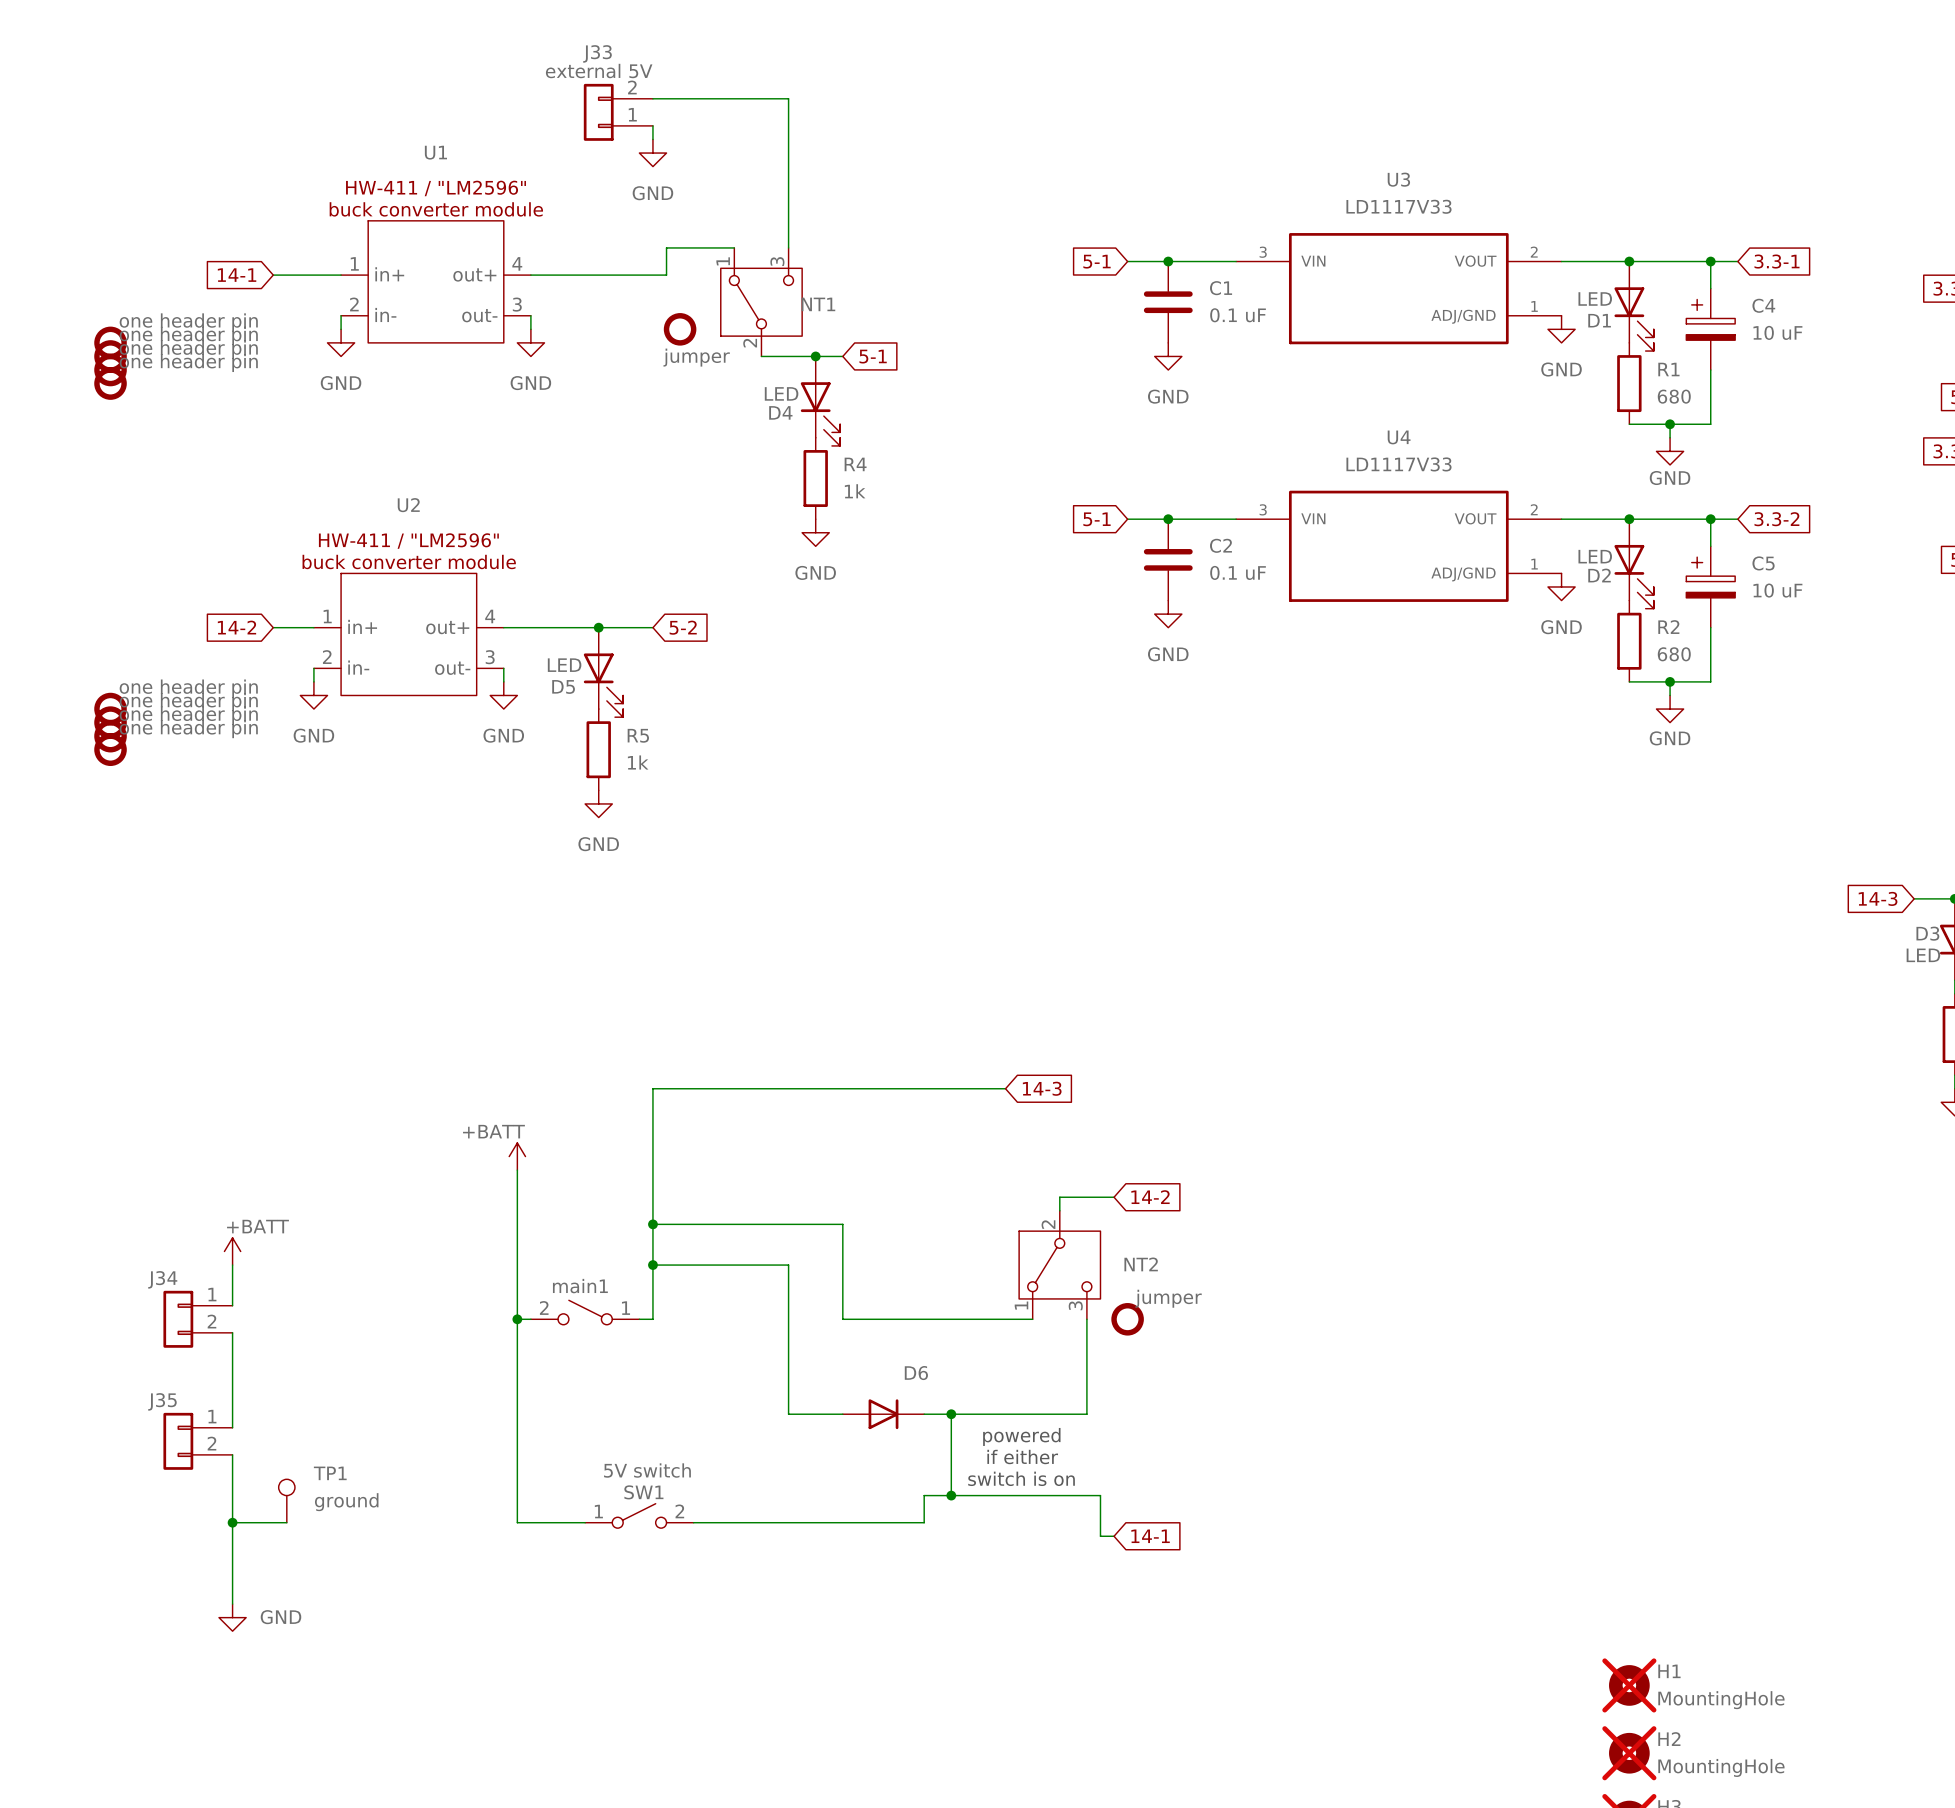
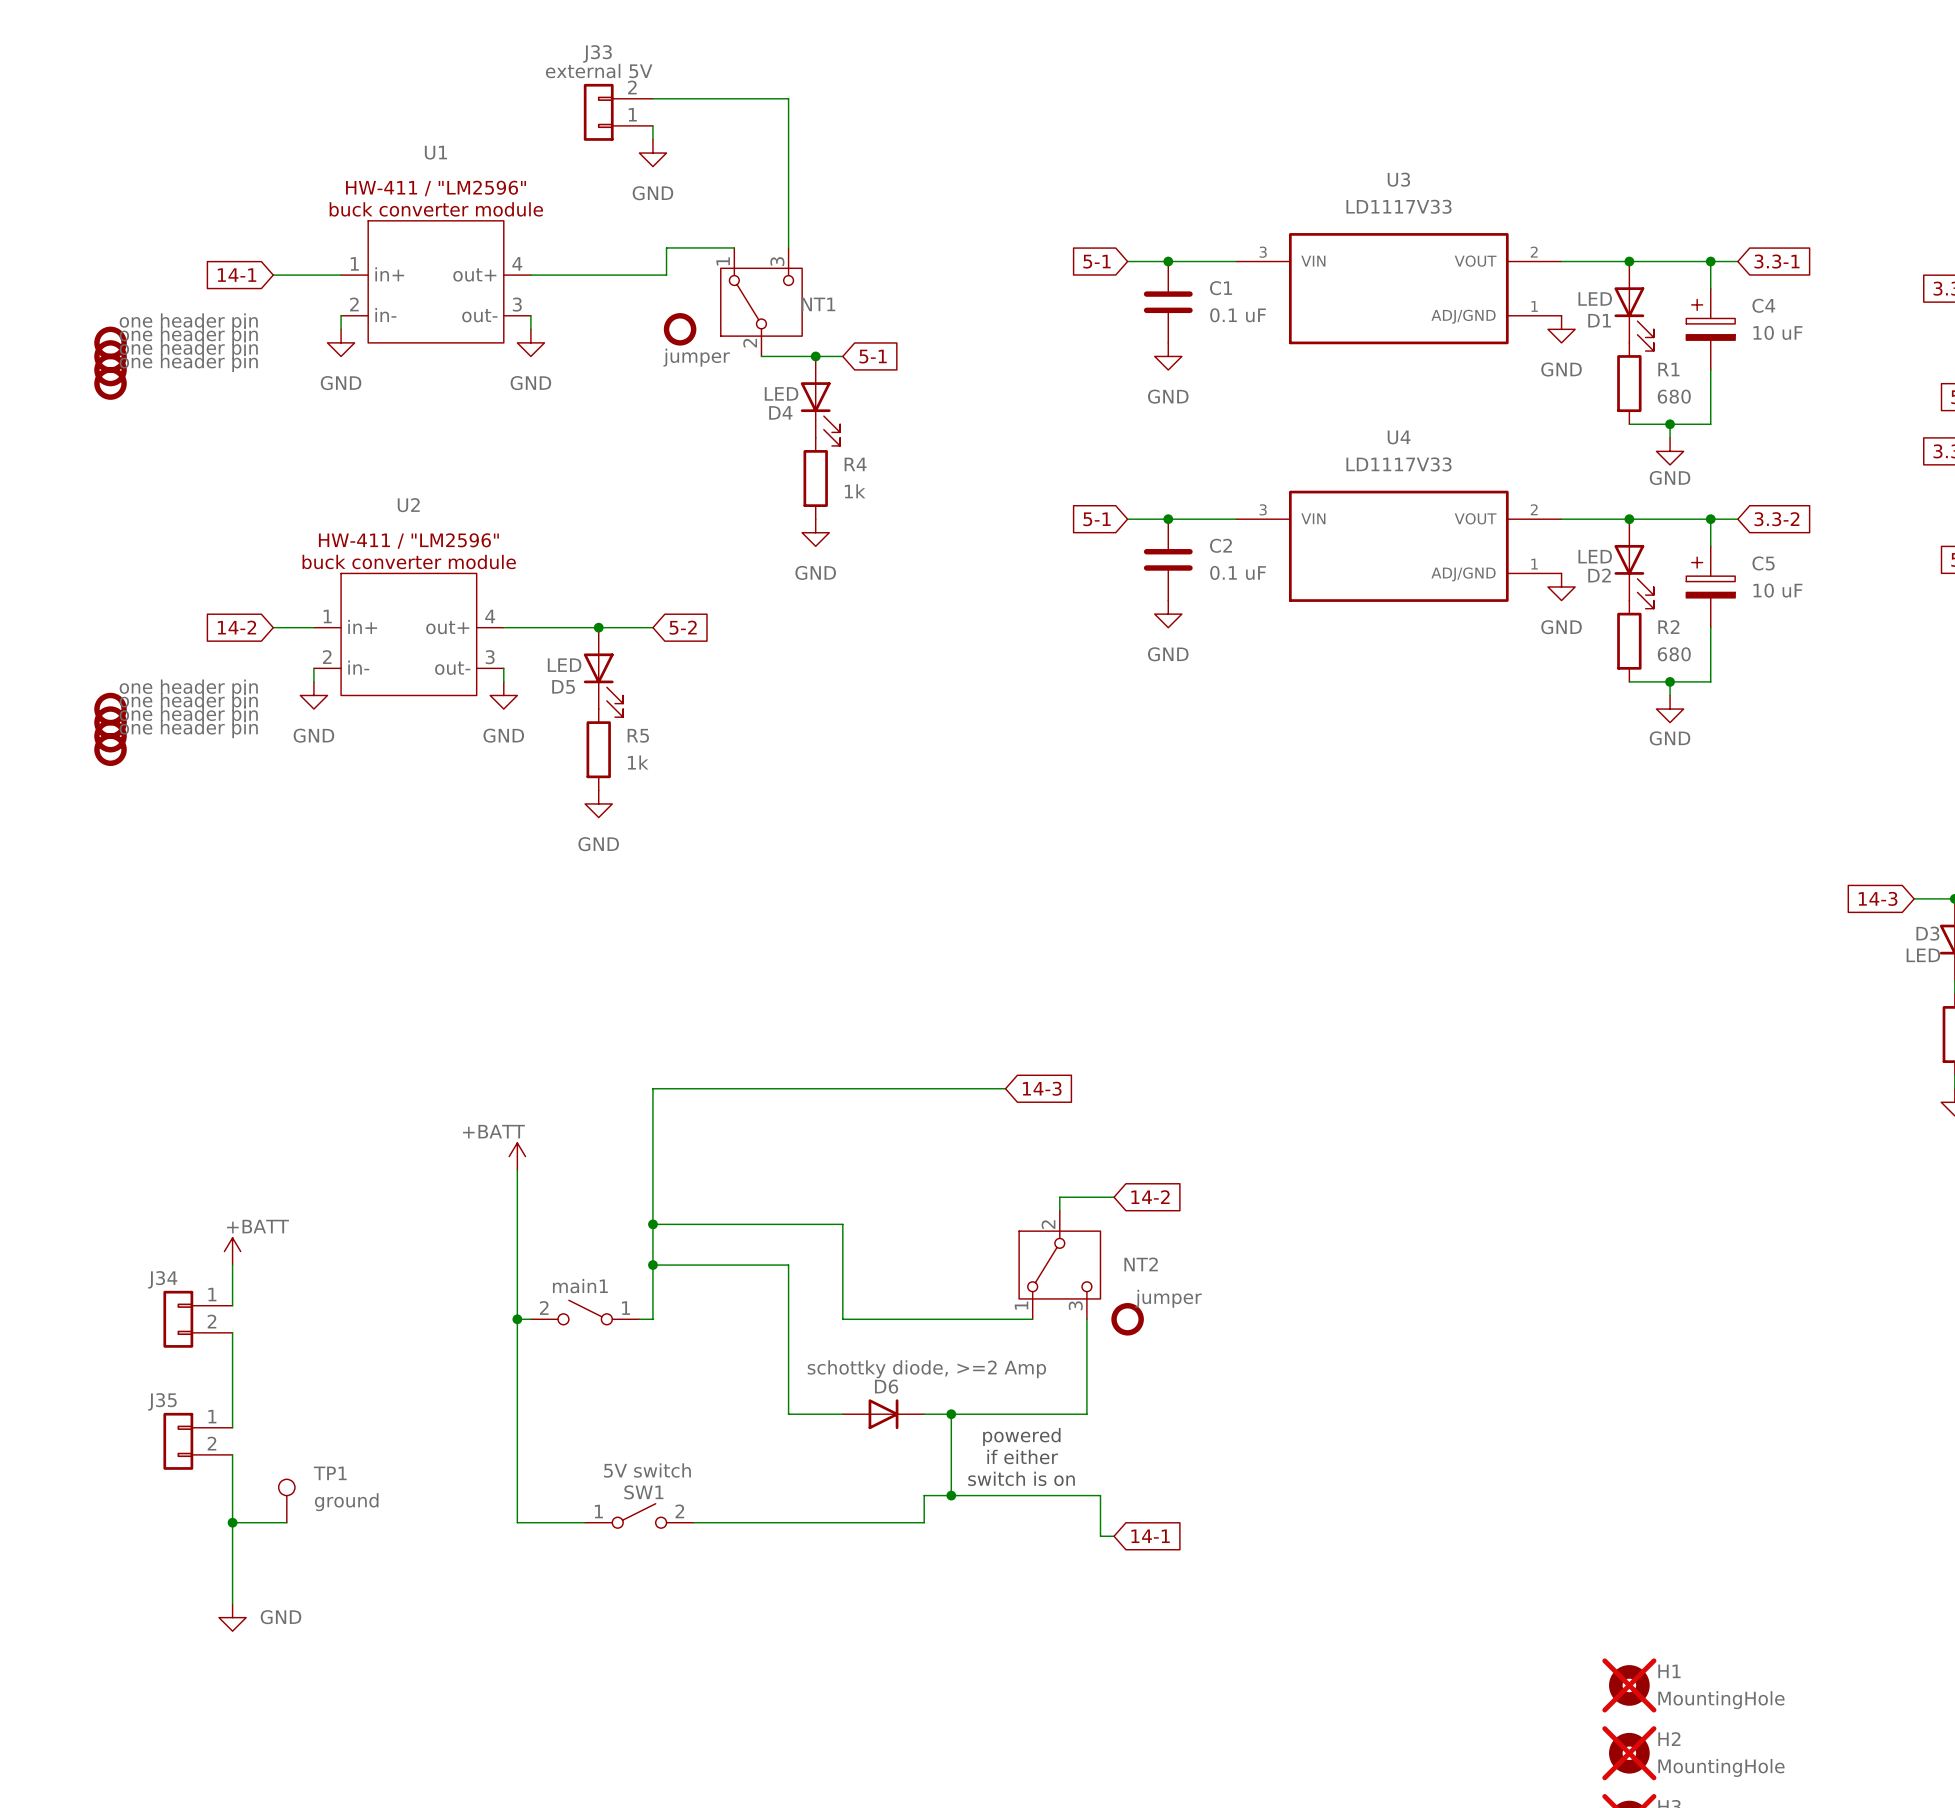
D6 value: none -> schottky diode, >=2 Amp (926, 1369)
D6 name position: D6 (916, 1373) -> D6 (886, 1386)

